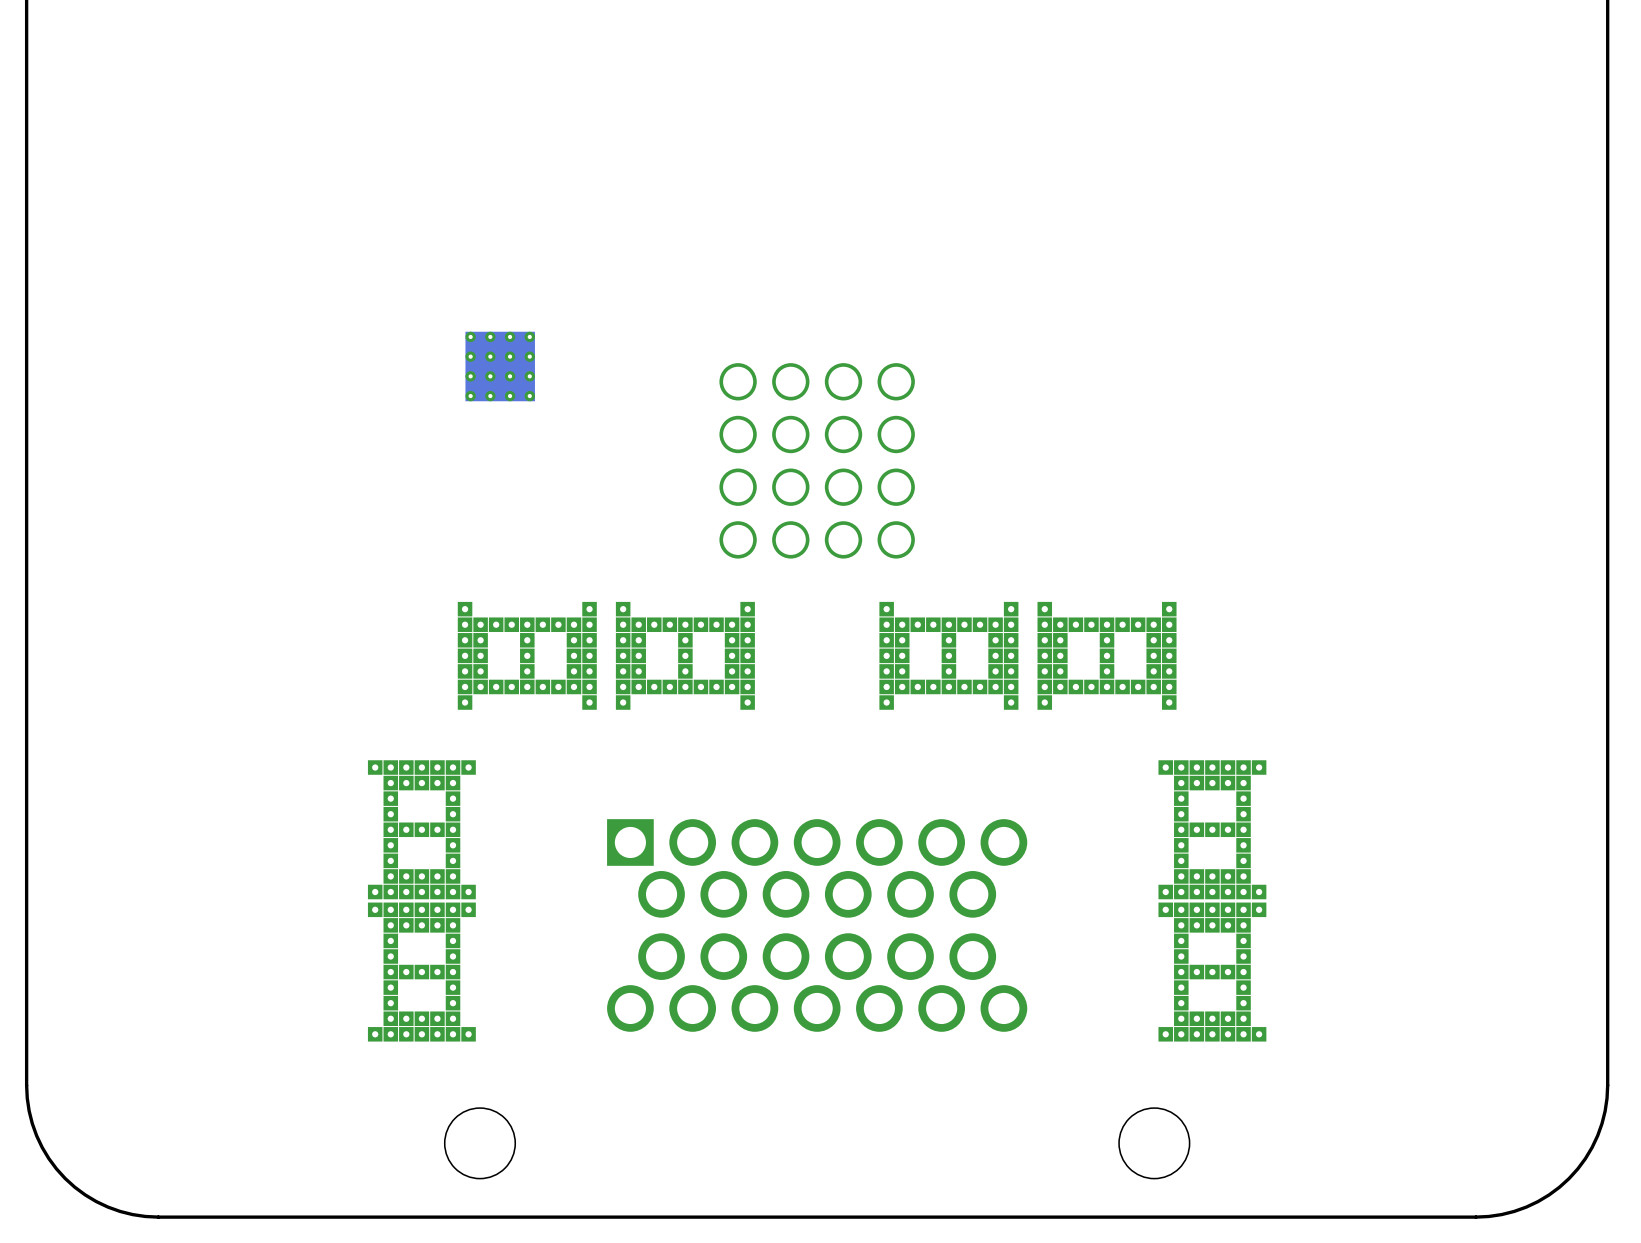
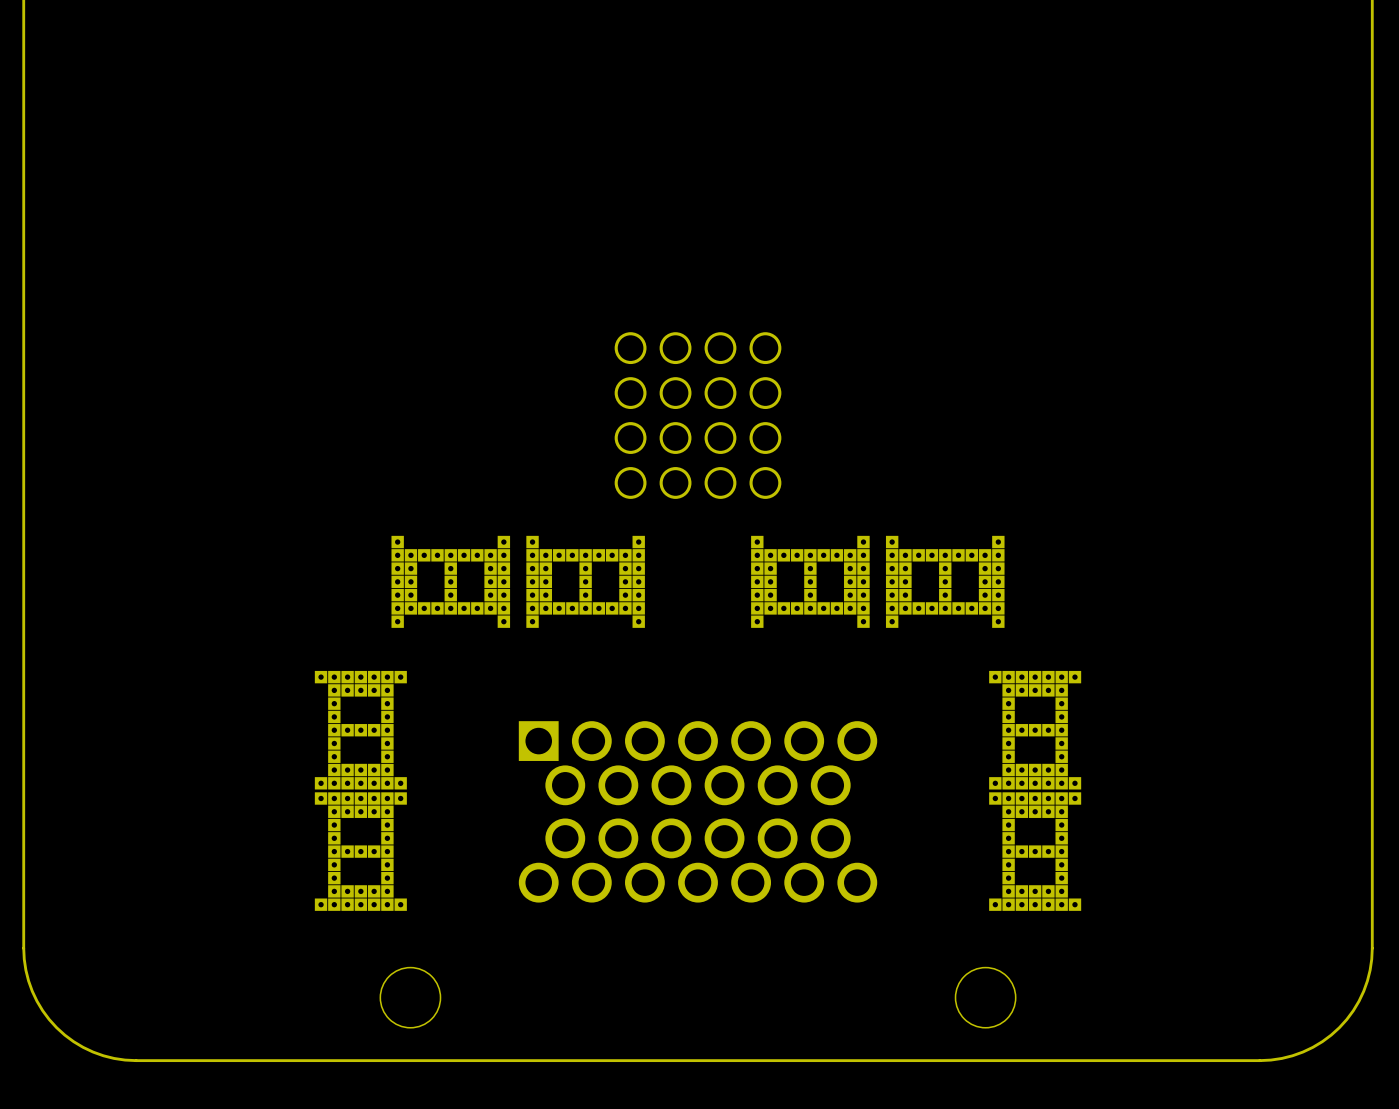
part: (500, 366) -> none

